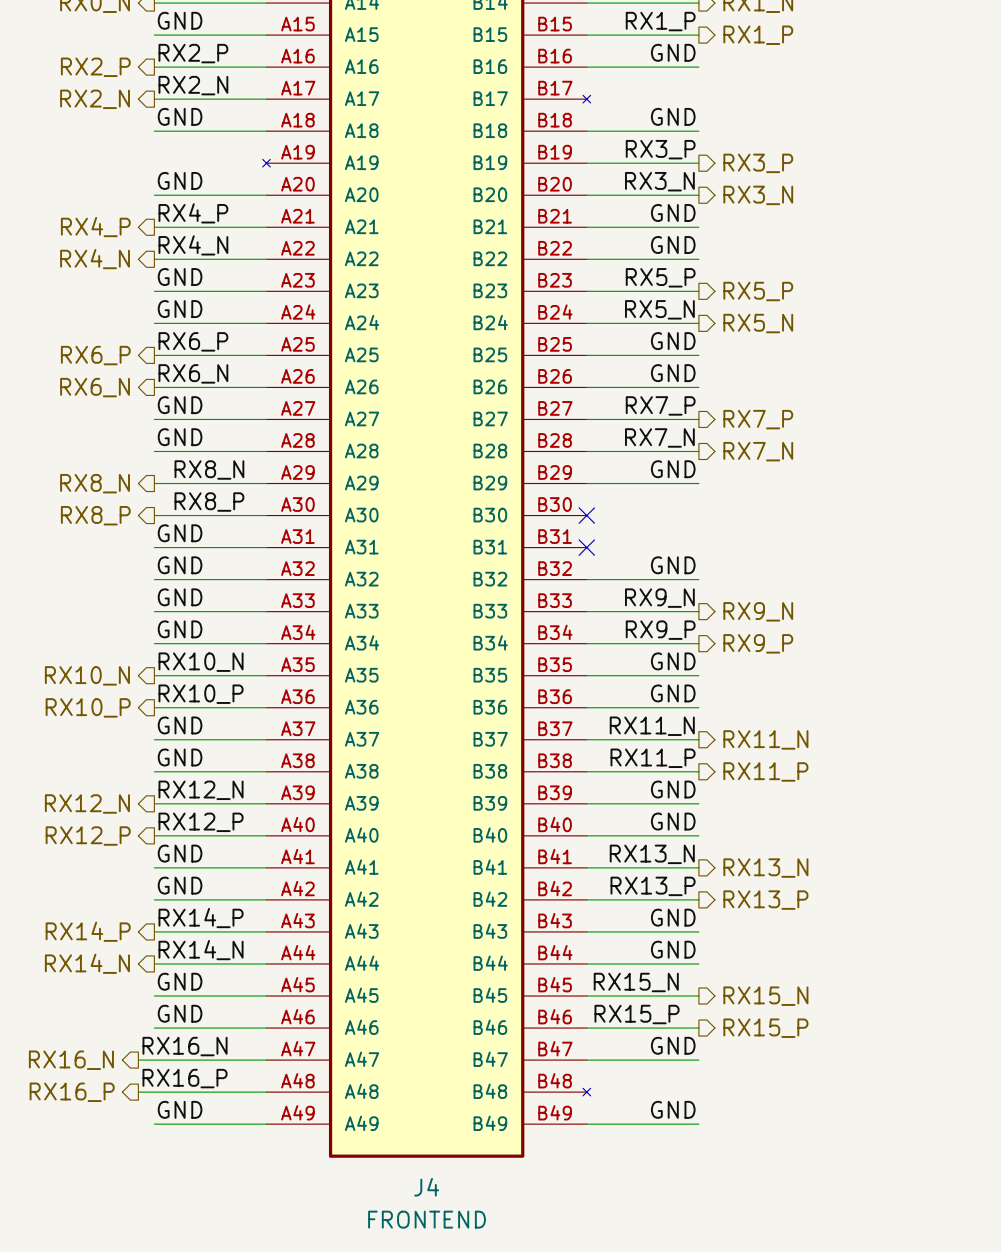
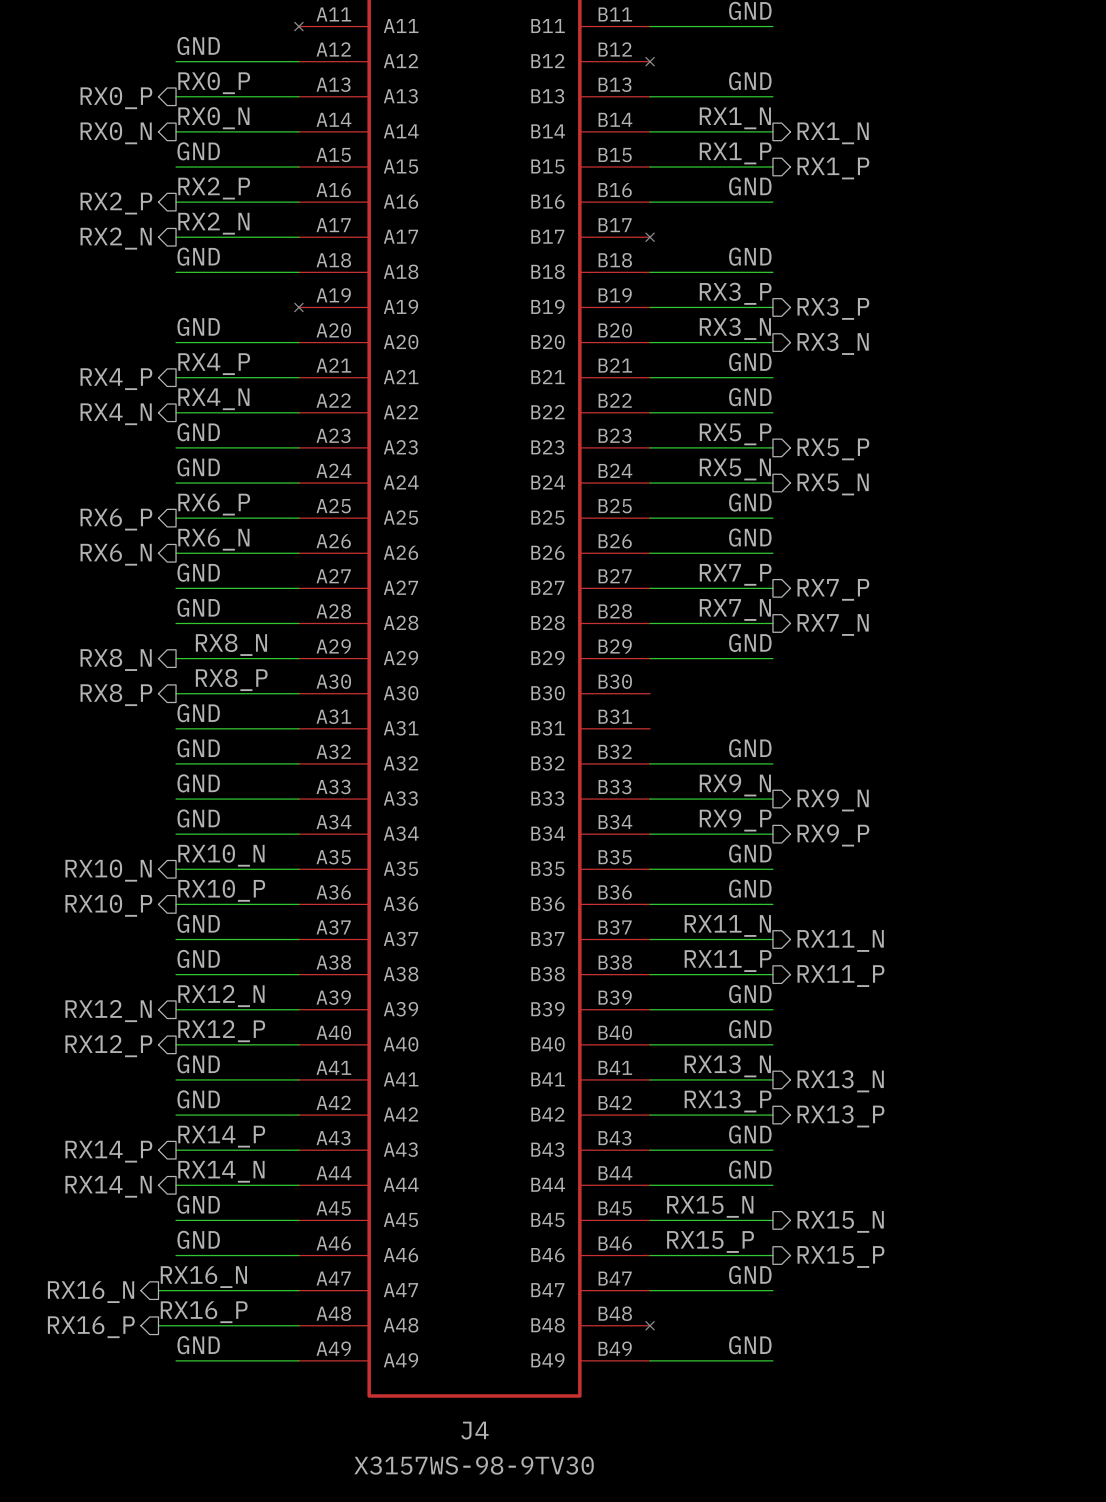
no-connect mark: (586, 515) -> none
no-connect mark: (586, 547) -> none
J4 value: FRONTEND (427, 1219) -> X3157WS-98-9TV30 (474, 1465)

